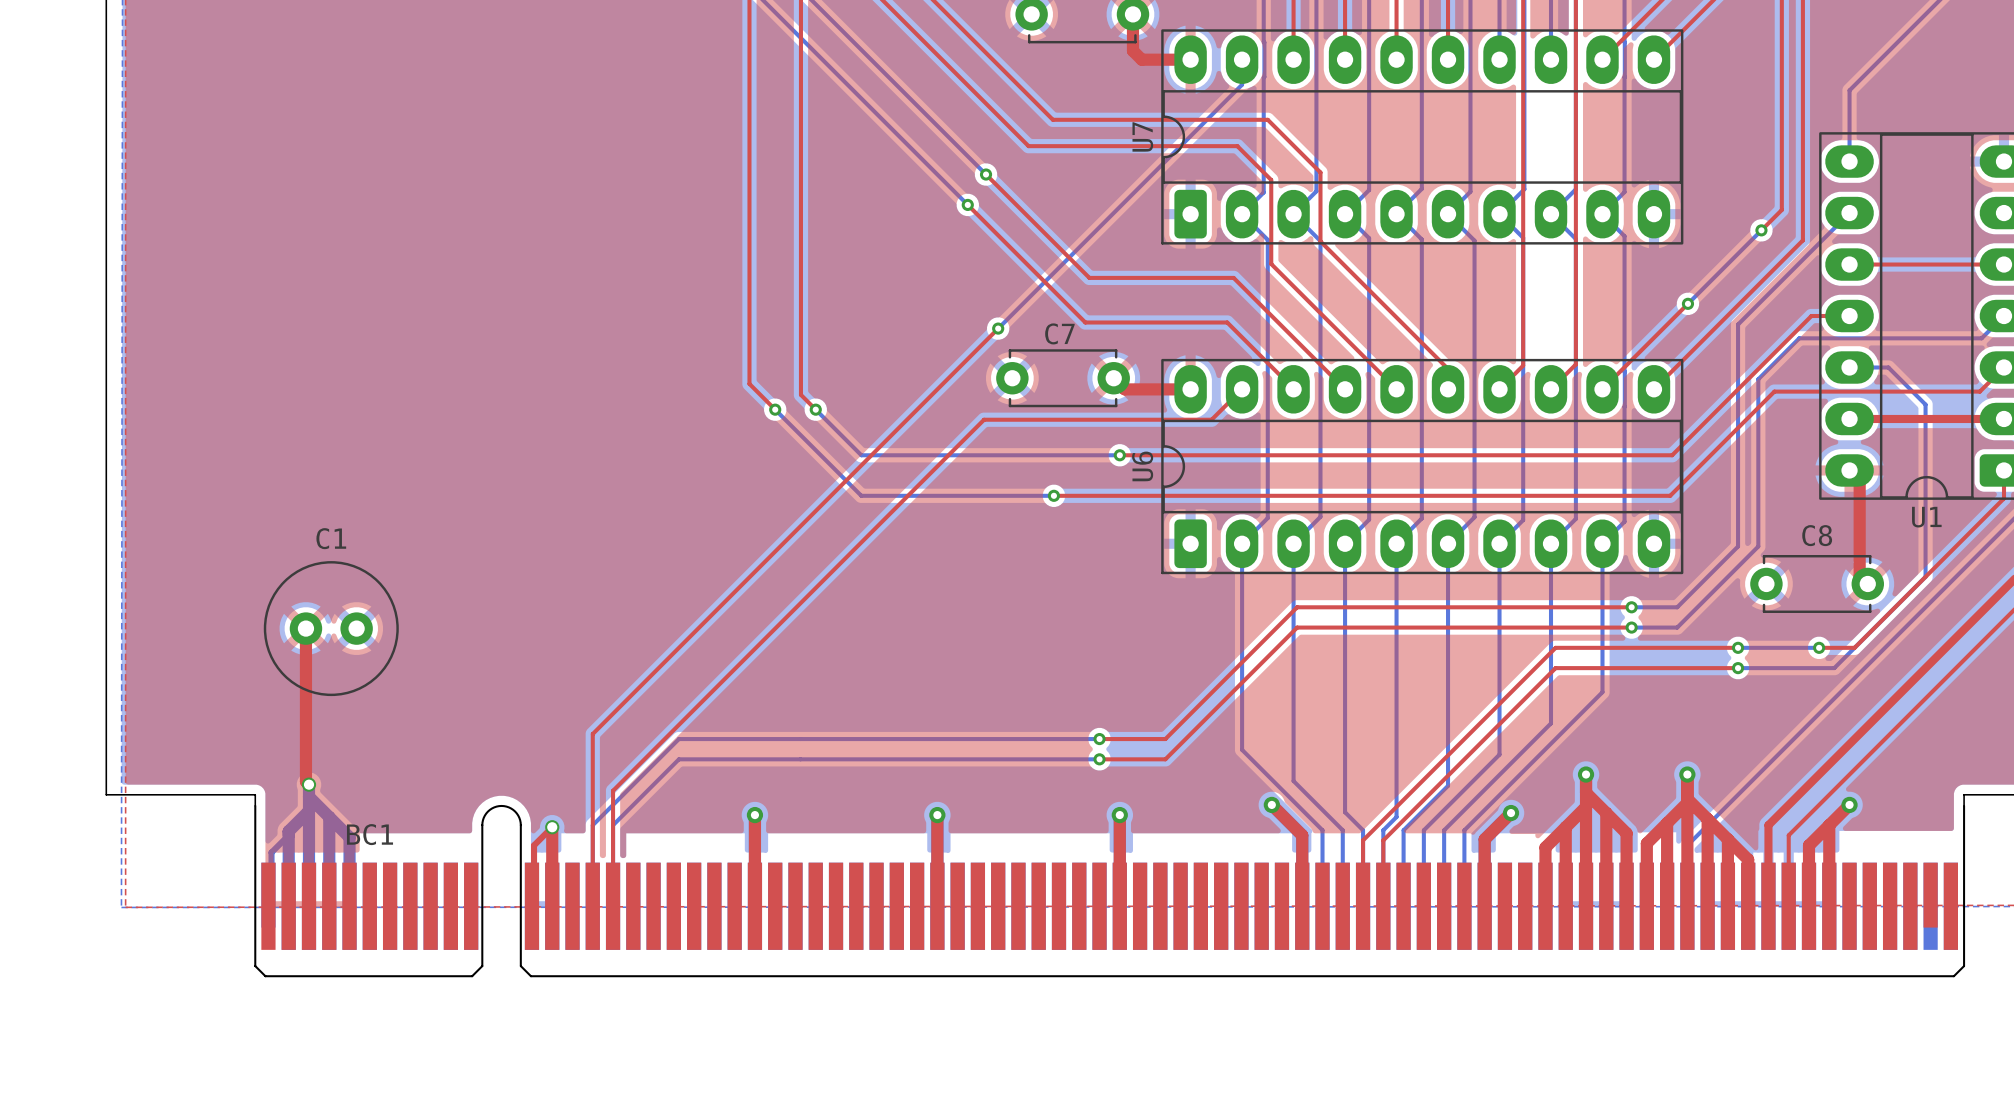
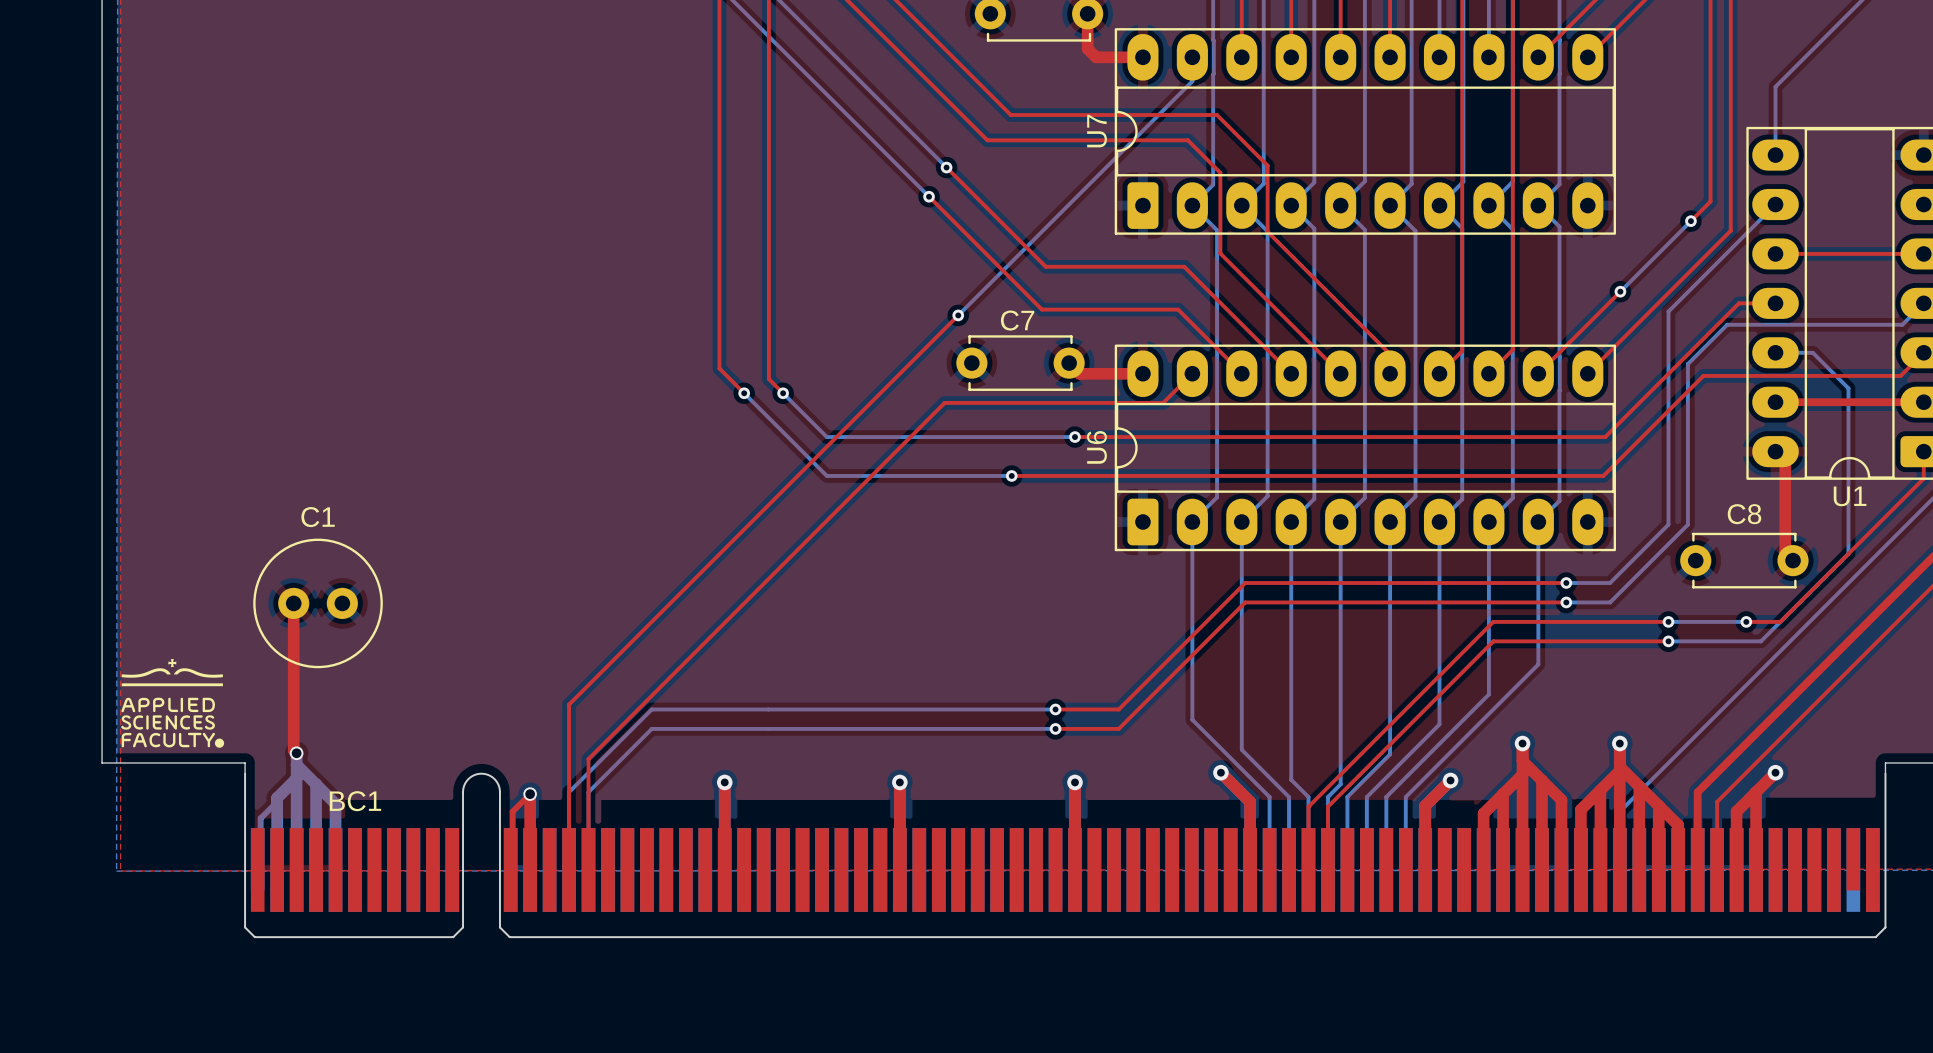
drawing: none -> [121, 659, 225, 748]

